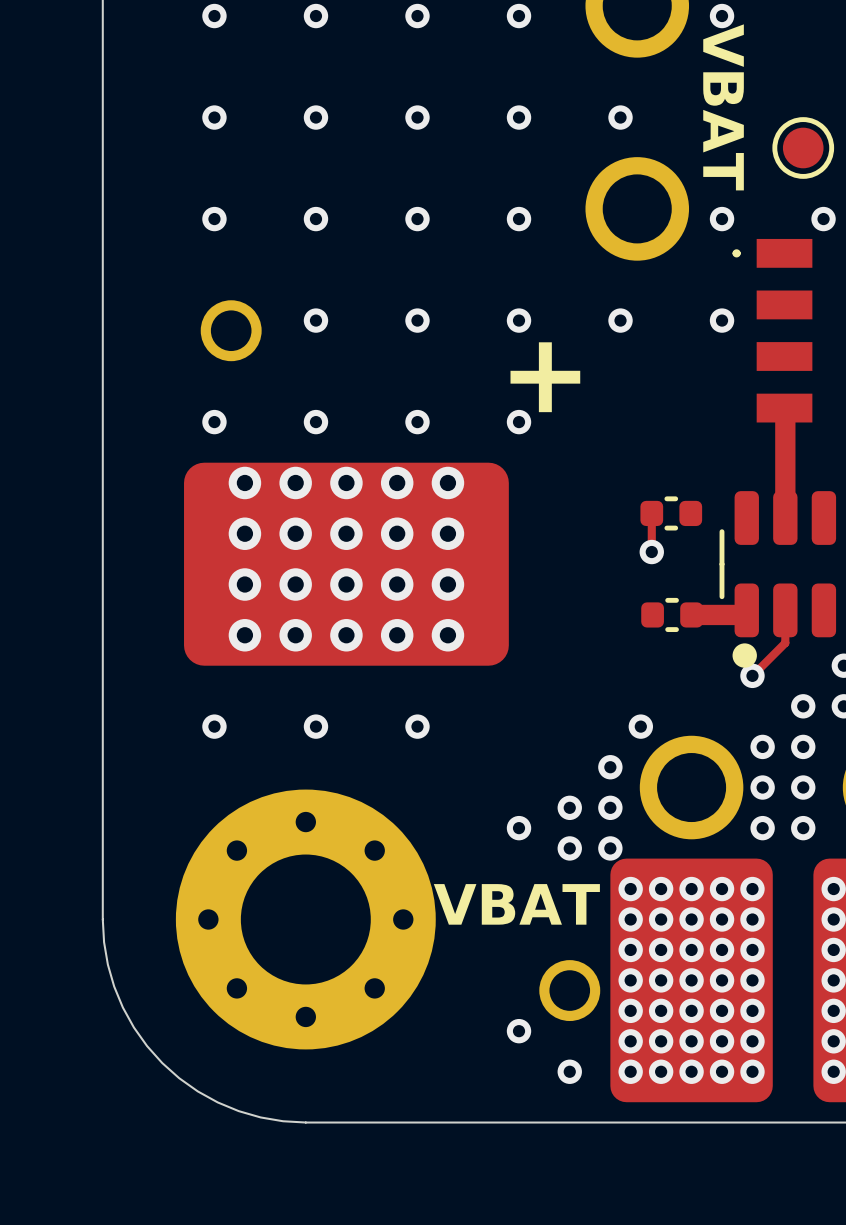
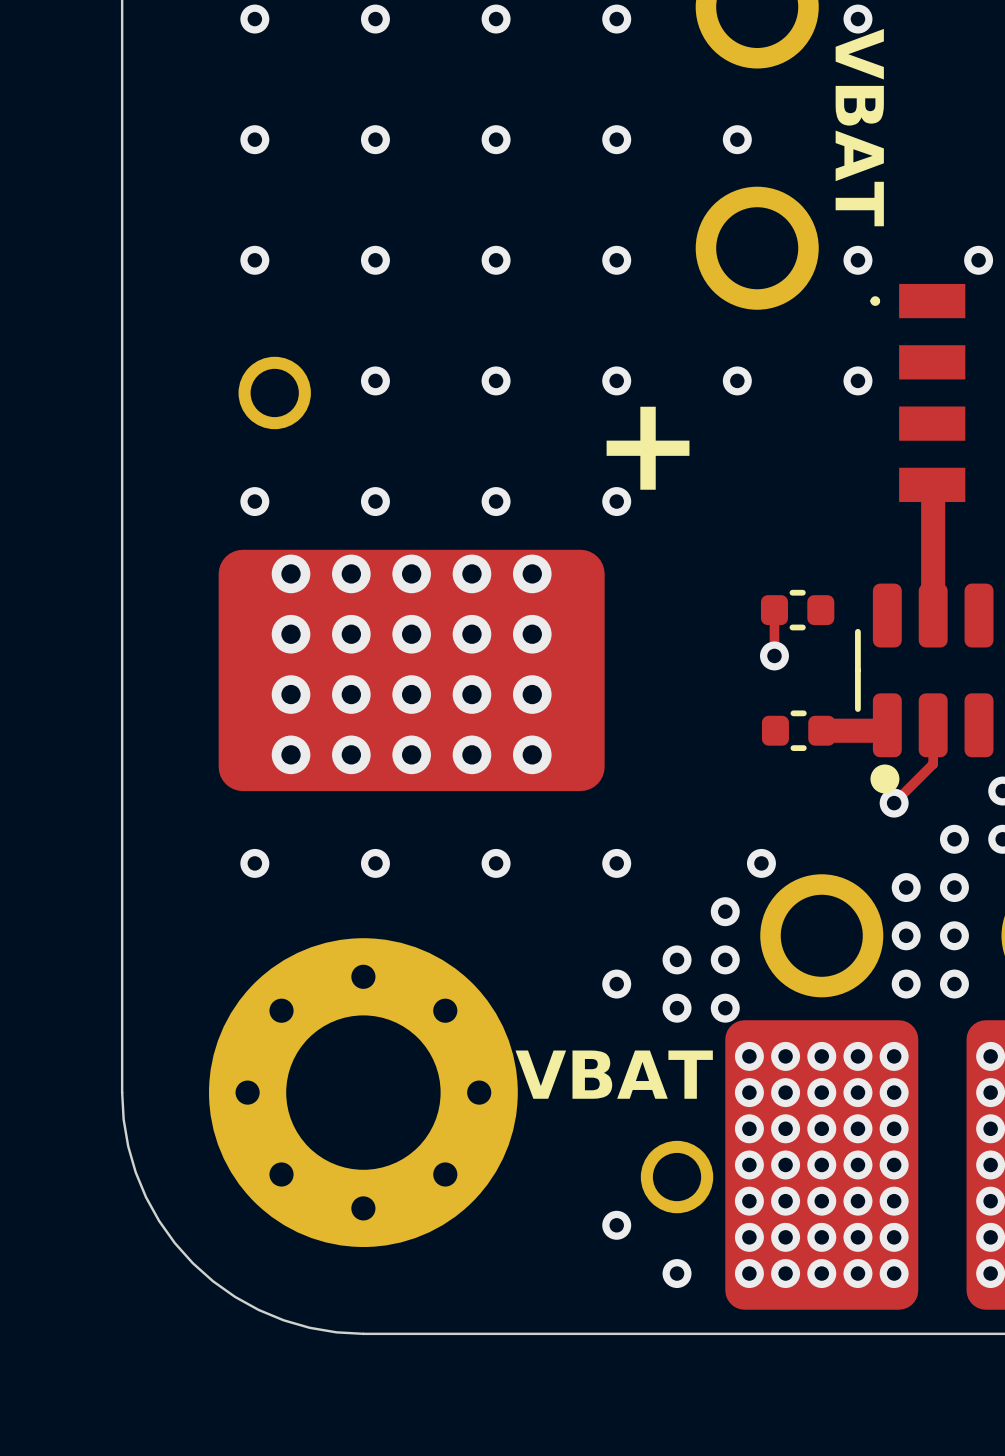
part: (803, 147) -> none
via: none -> (616, 863)

